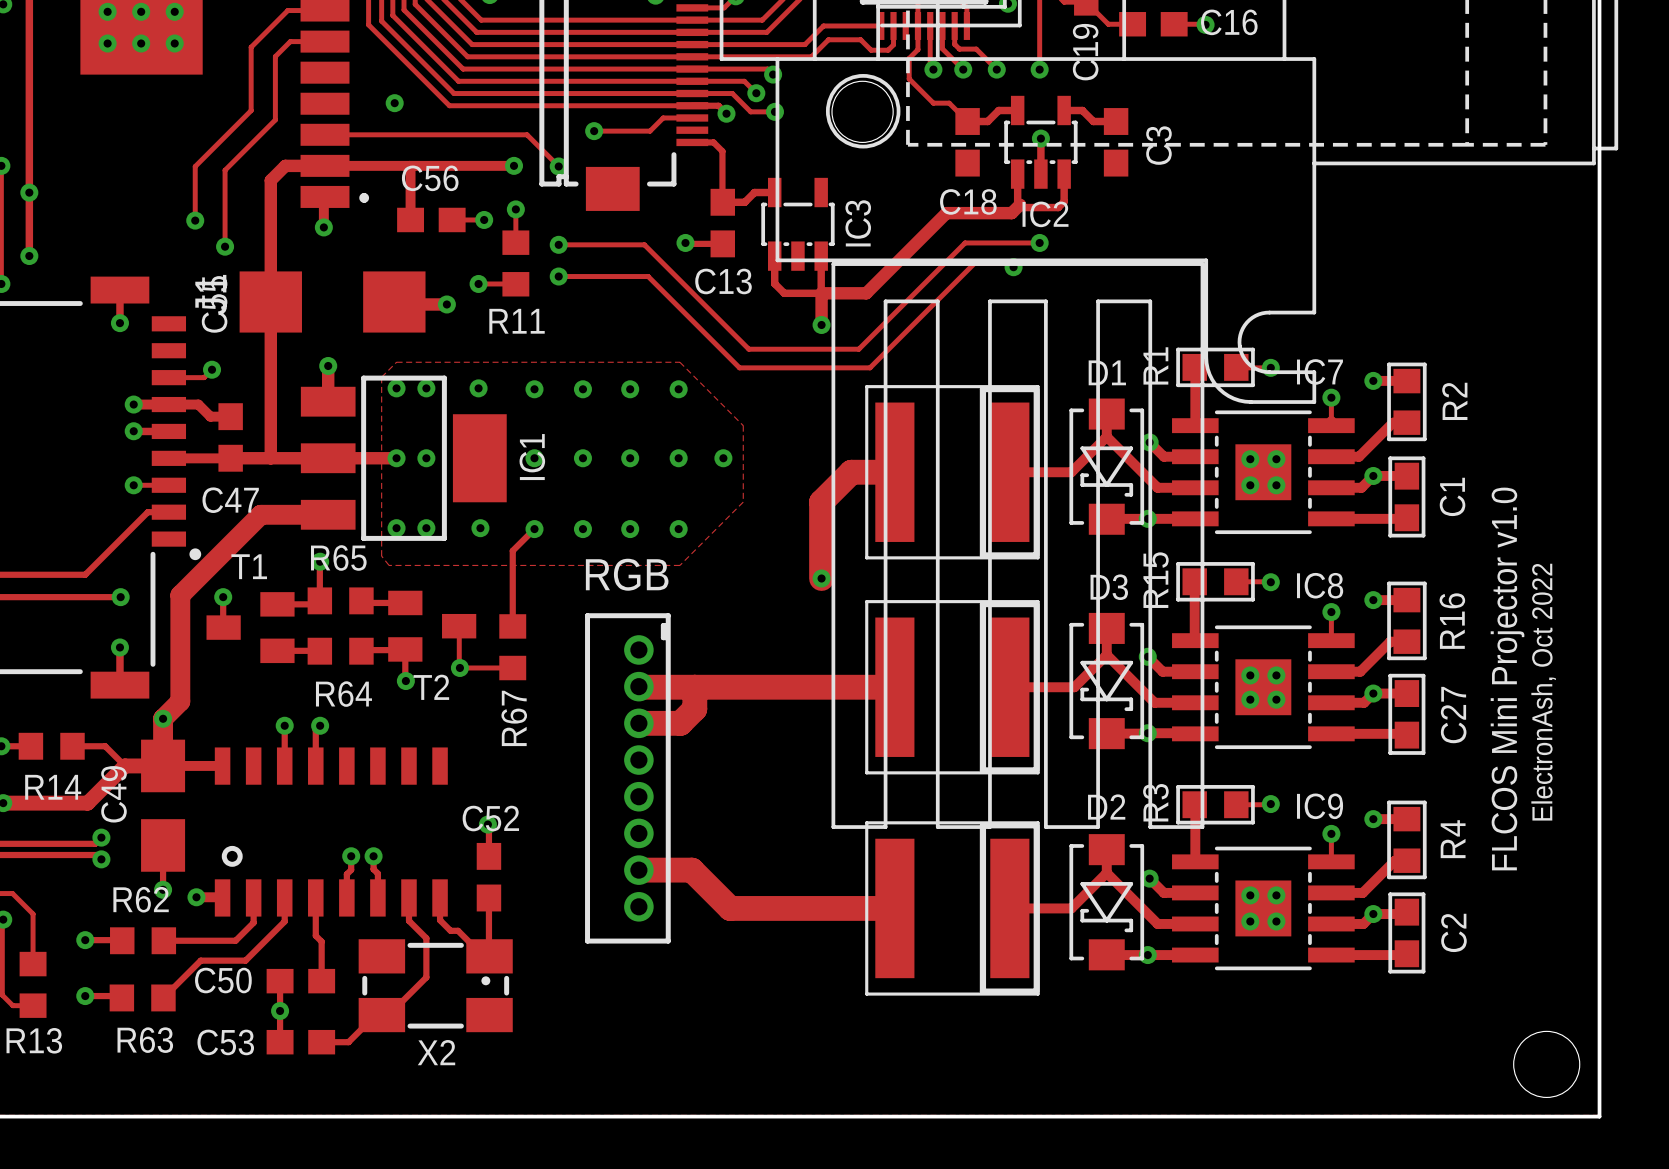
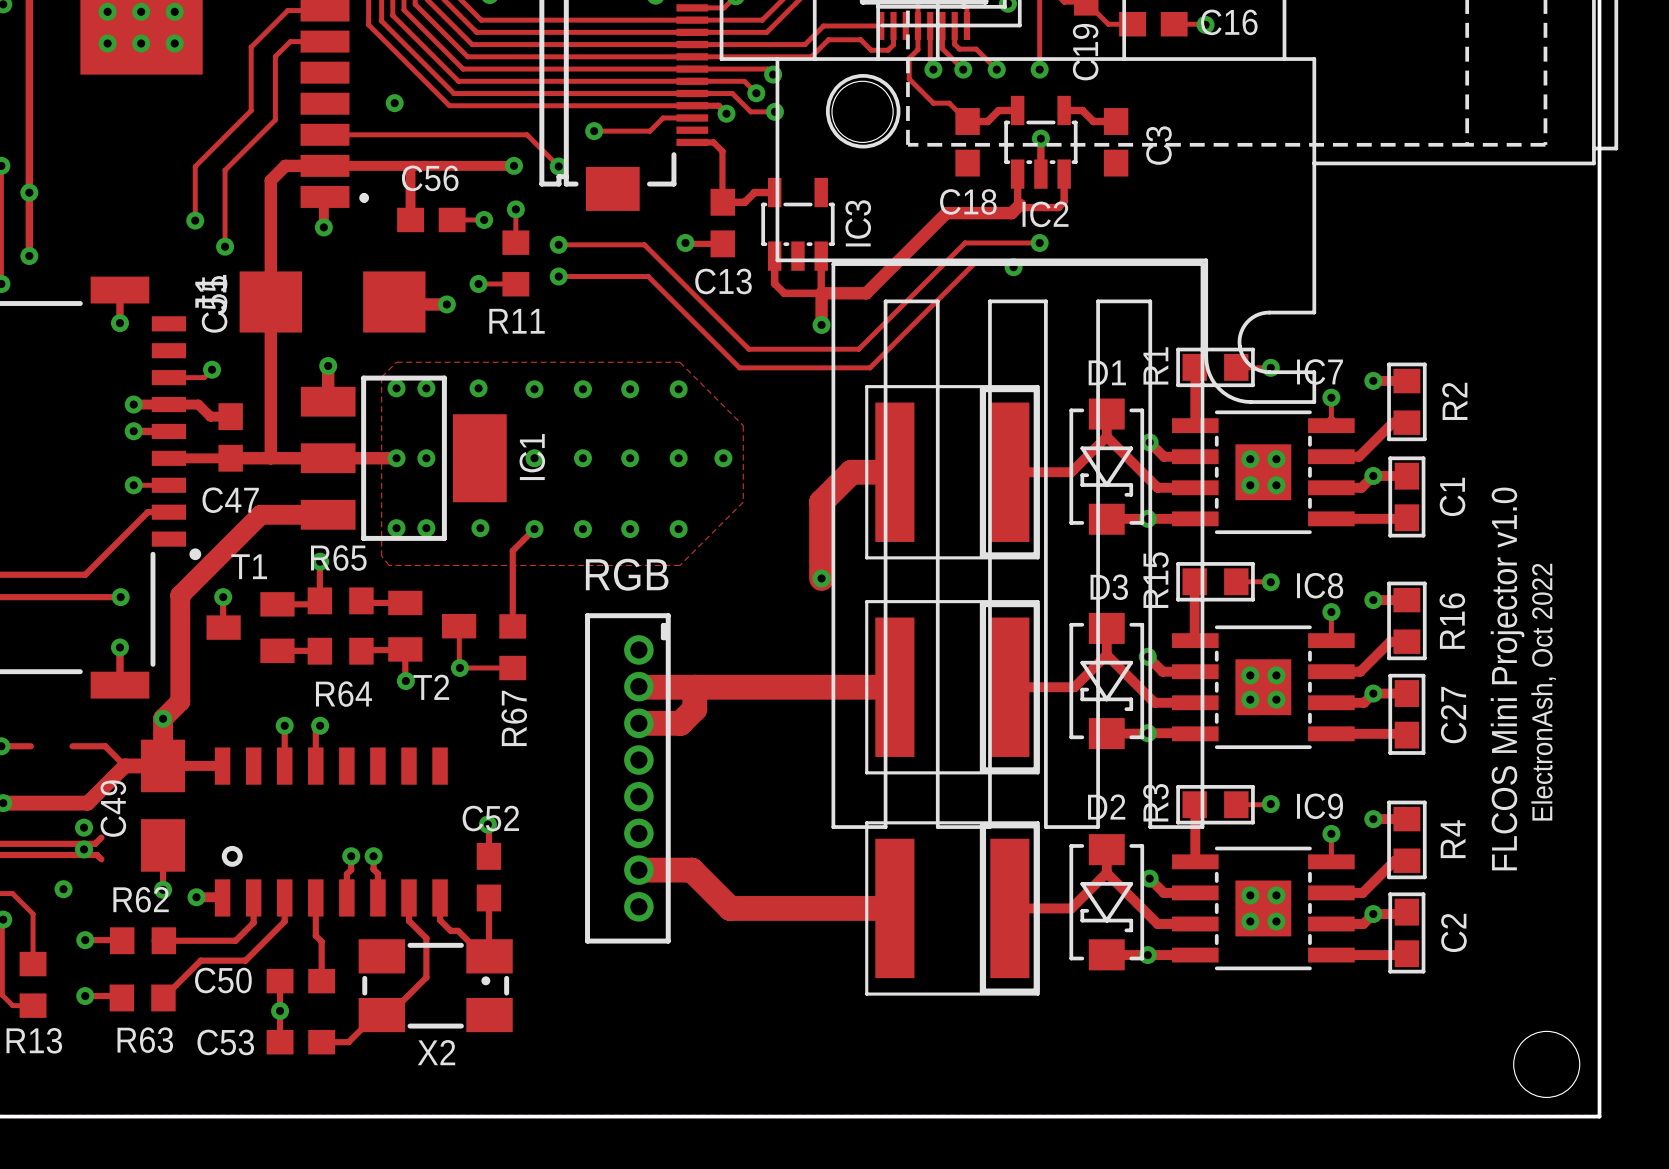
R14: (51, 746) -> none
C49 name position: C49 (113, 794) -> C49 (113, 808)
via: none -> (84, 827)
via: (101, 837) -> none
via: none -> (84, 849)
via: (101, 859) -> none
via: none -> (63, 889)

